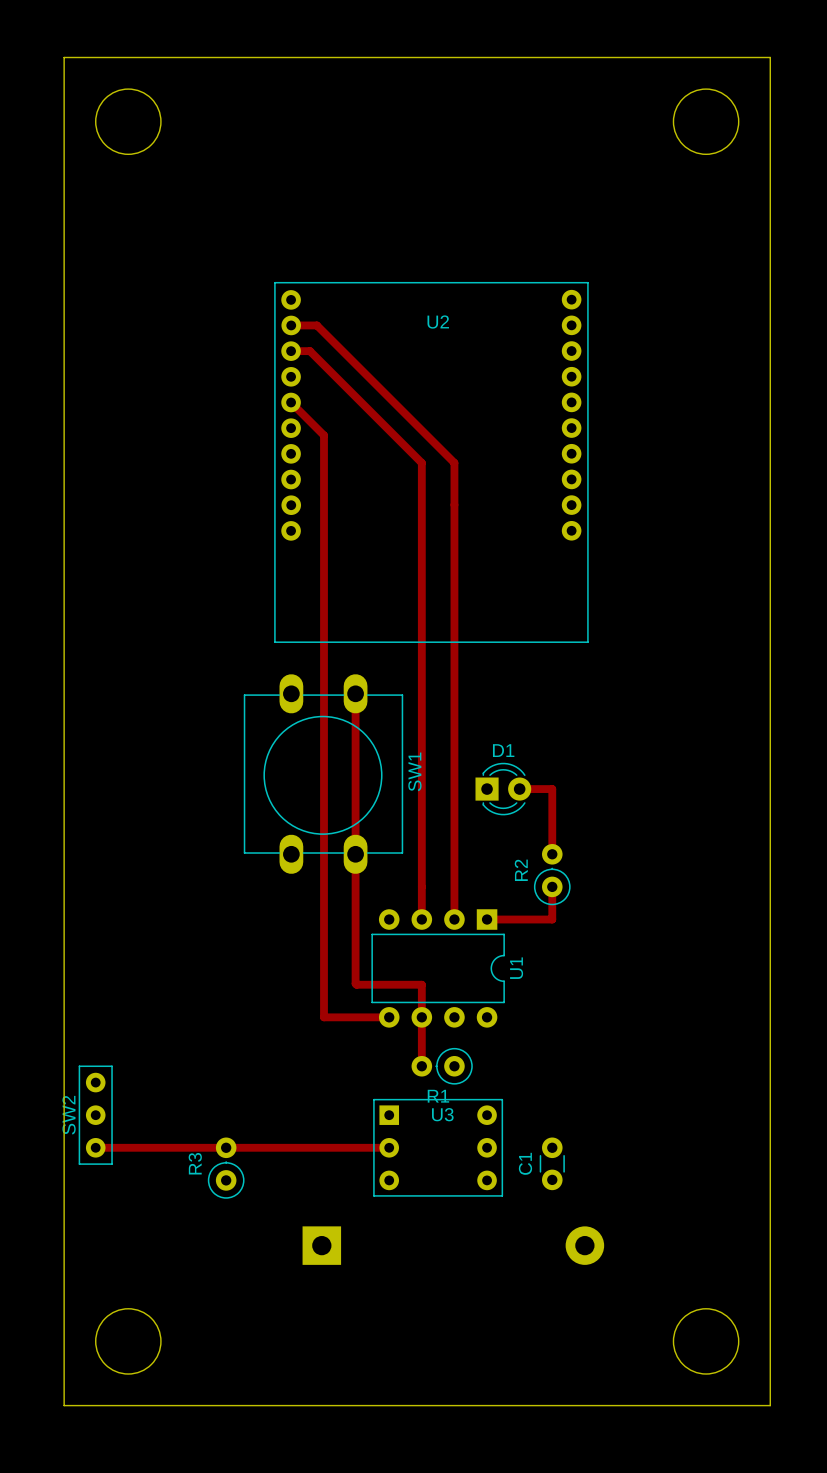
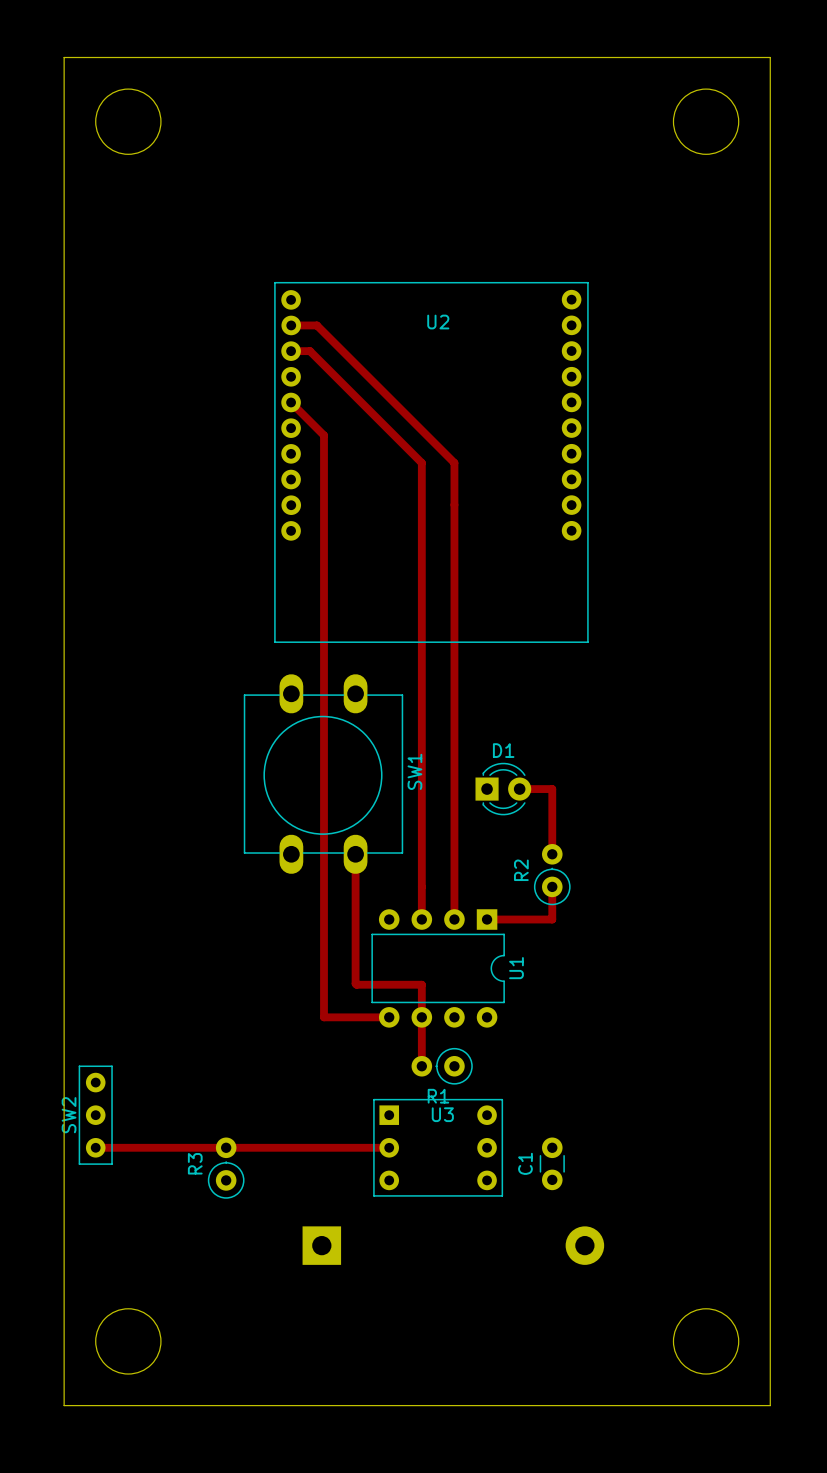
track: (355, 692) (355, 854) -> none

